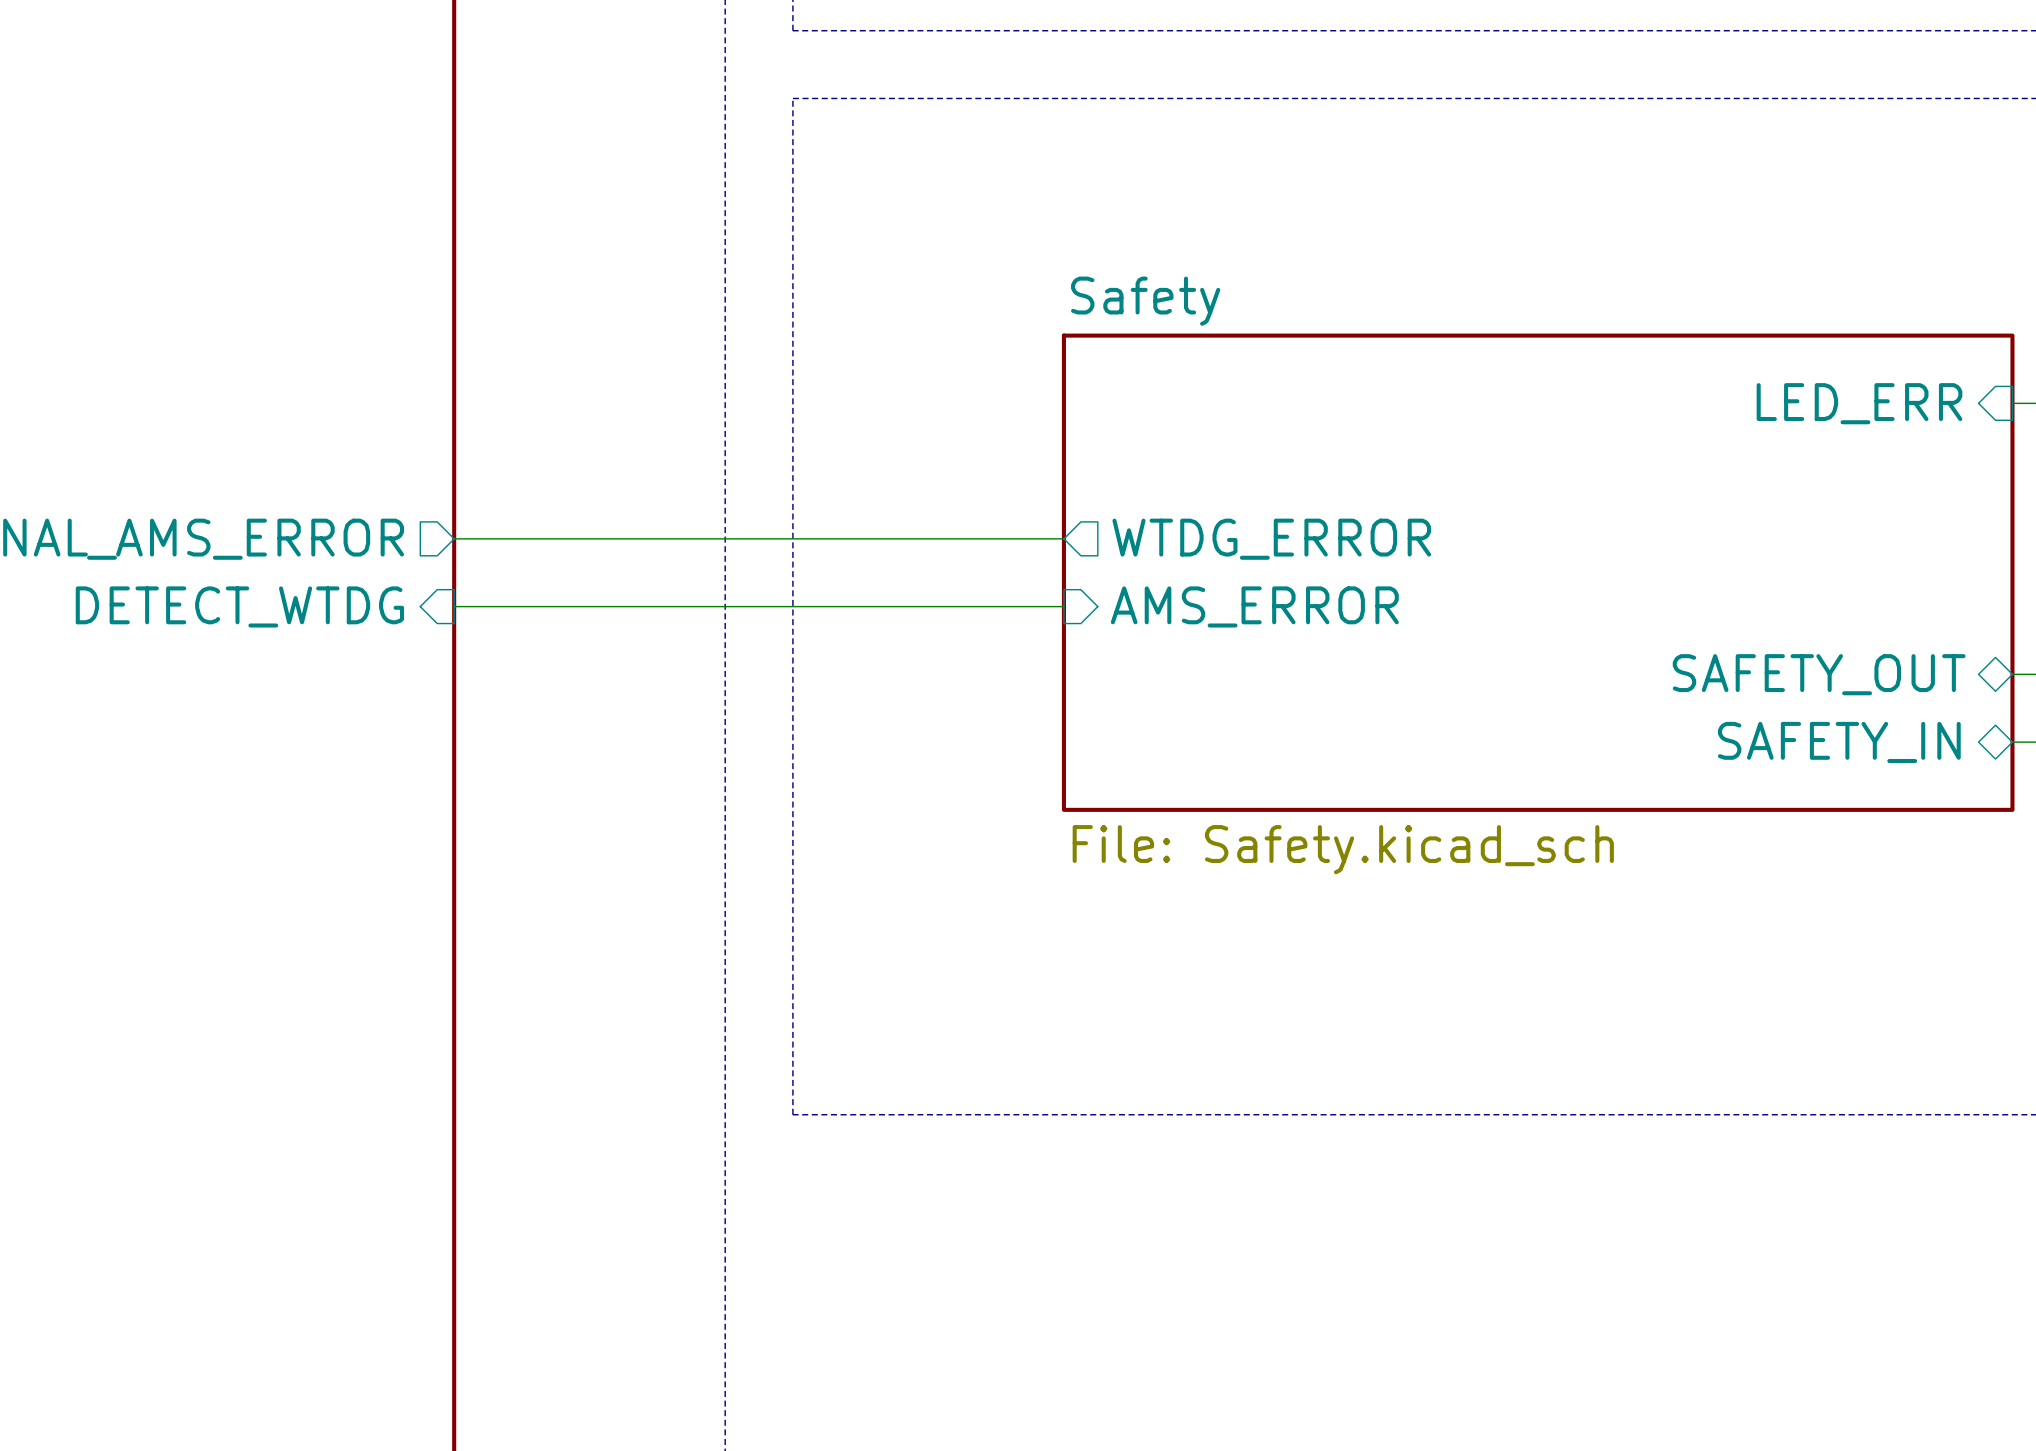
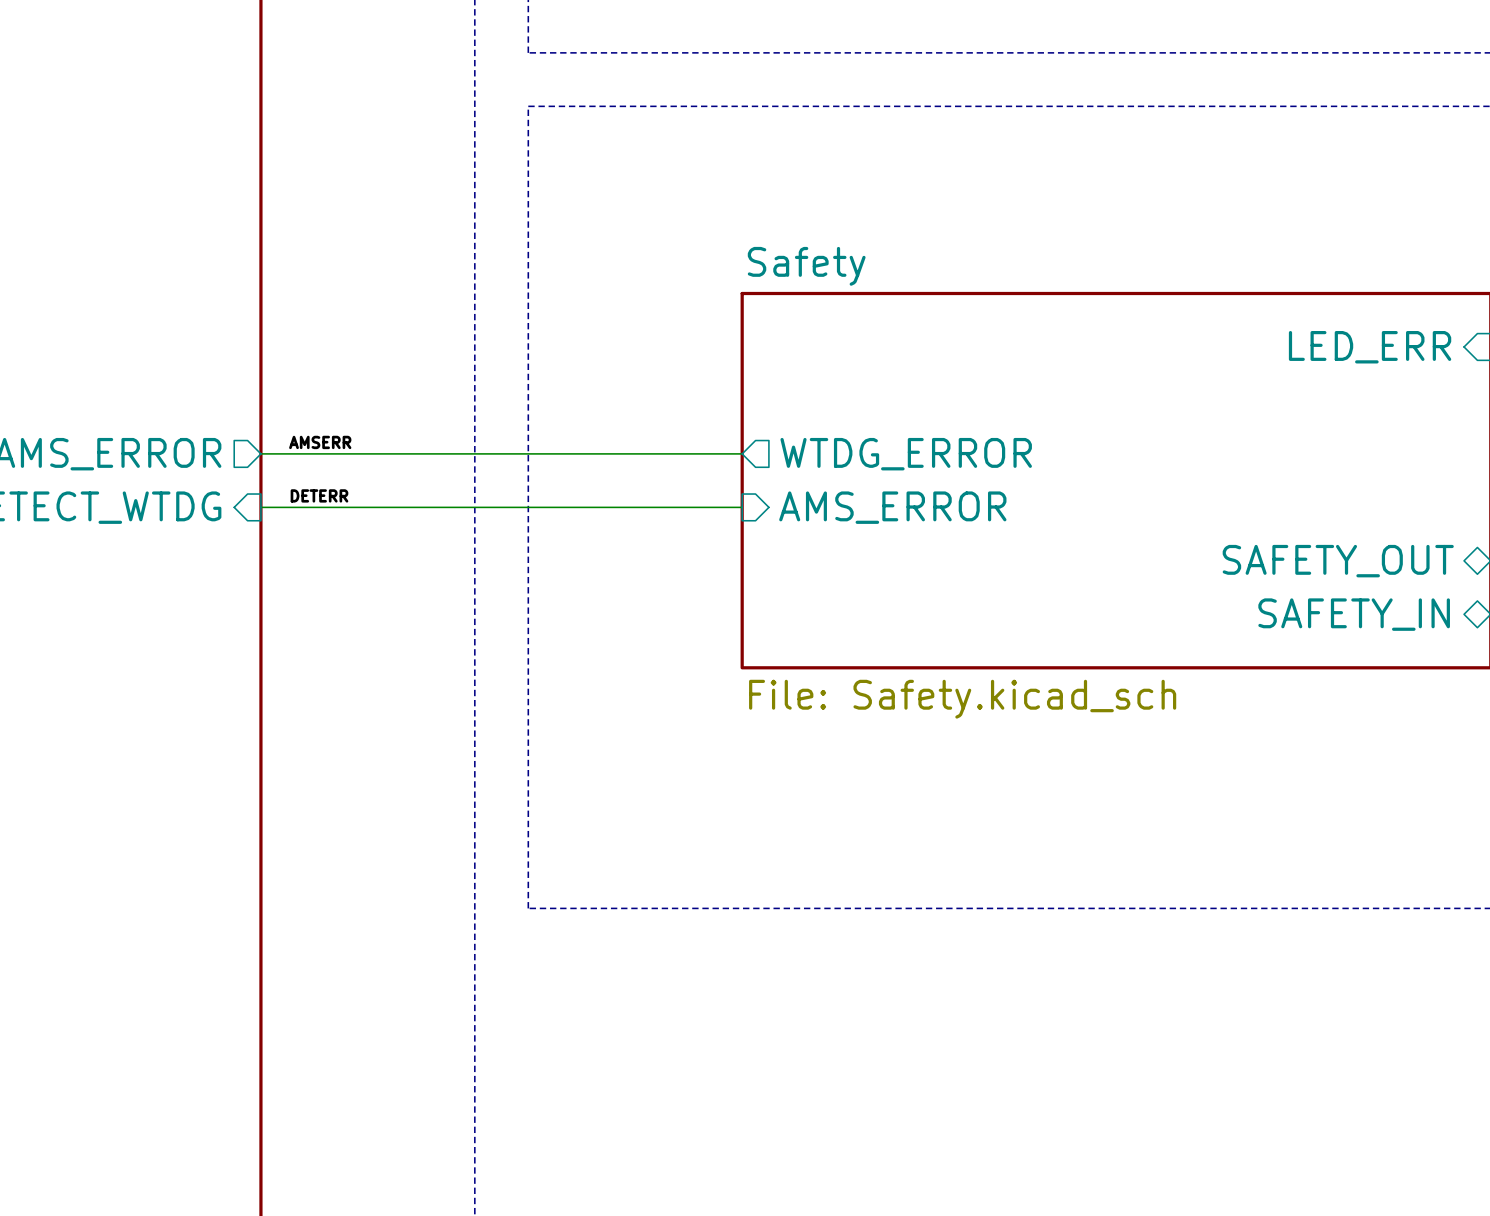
label: none -> AMSERR (320, 442)
label: none -> DETERR (319, 495)

